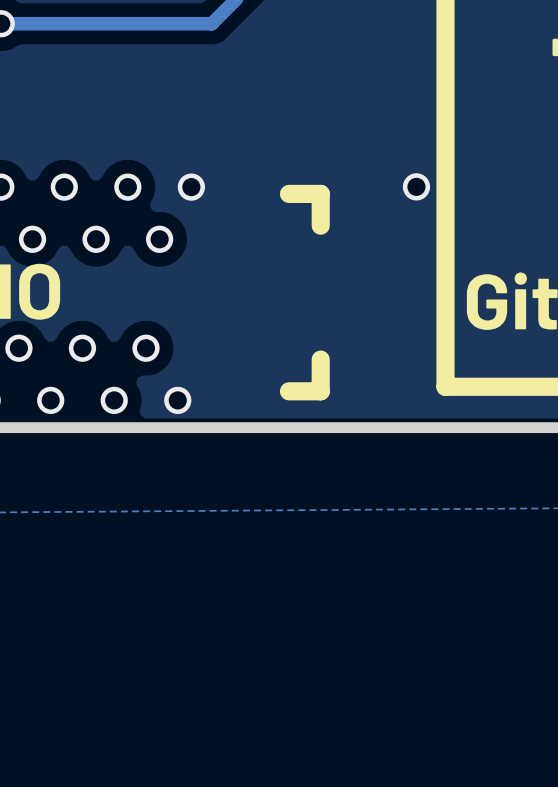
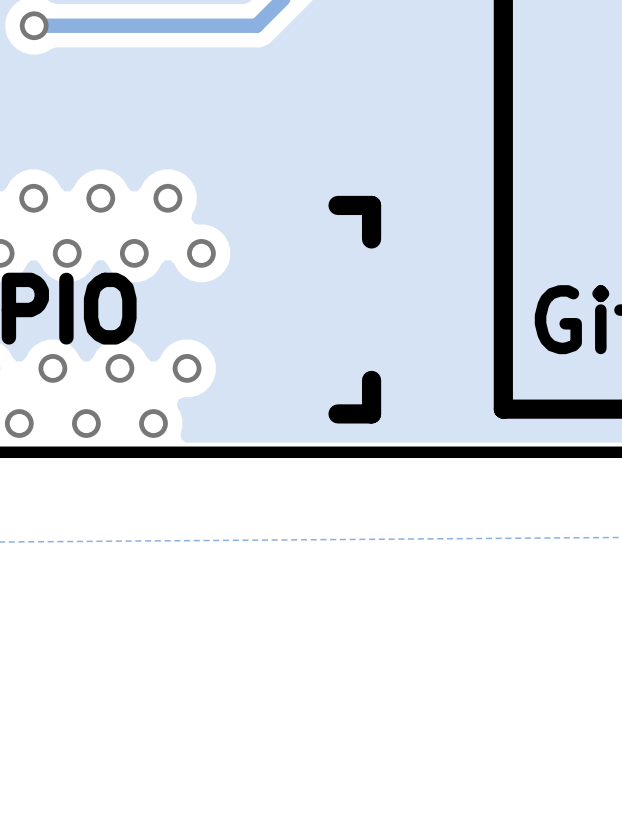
via: (416, 186) -> none
via: (191, 187) -> none
via: (177, 400) -> none

